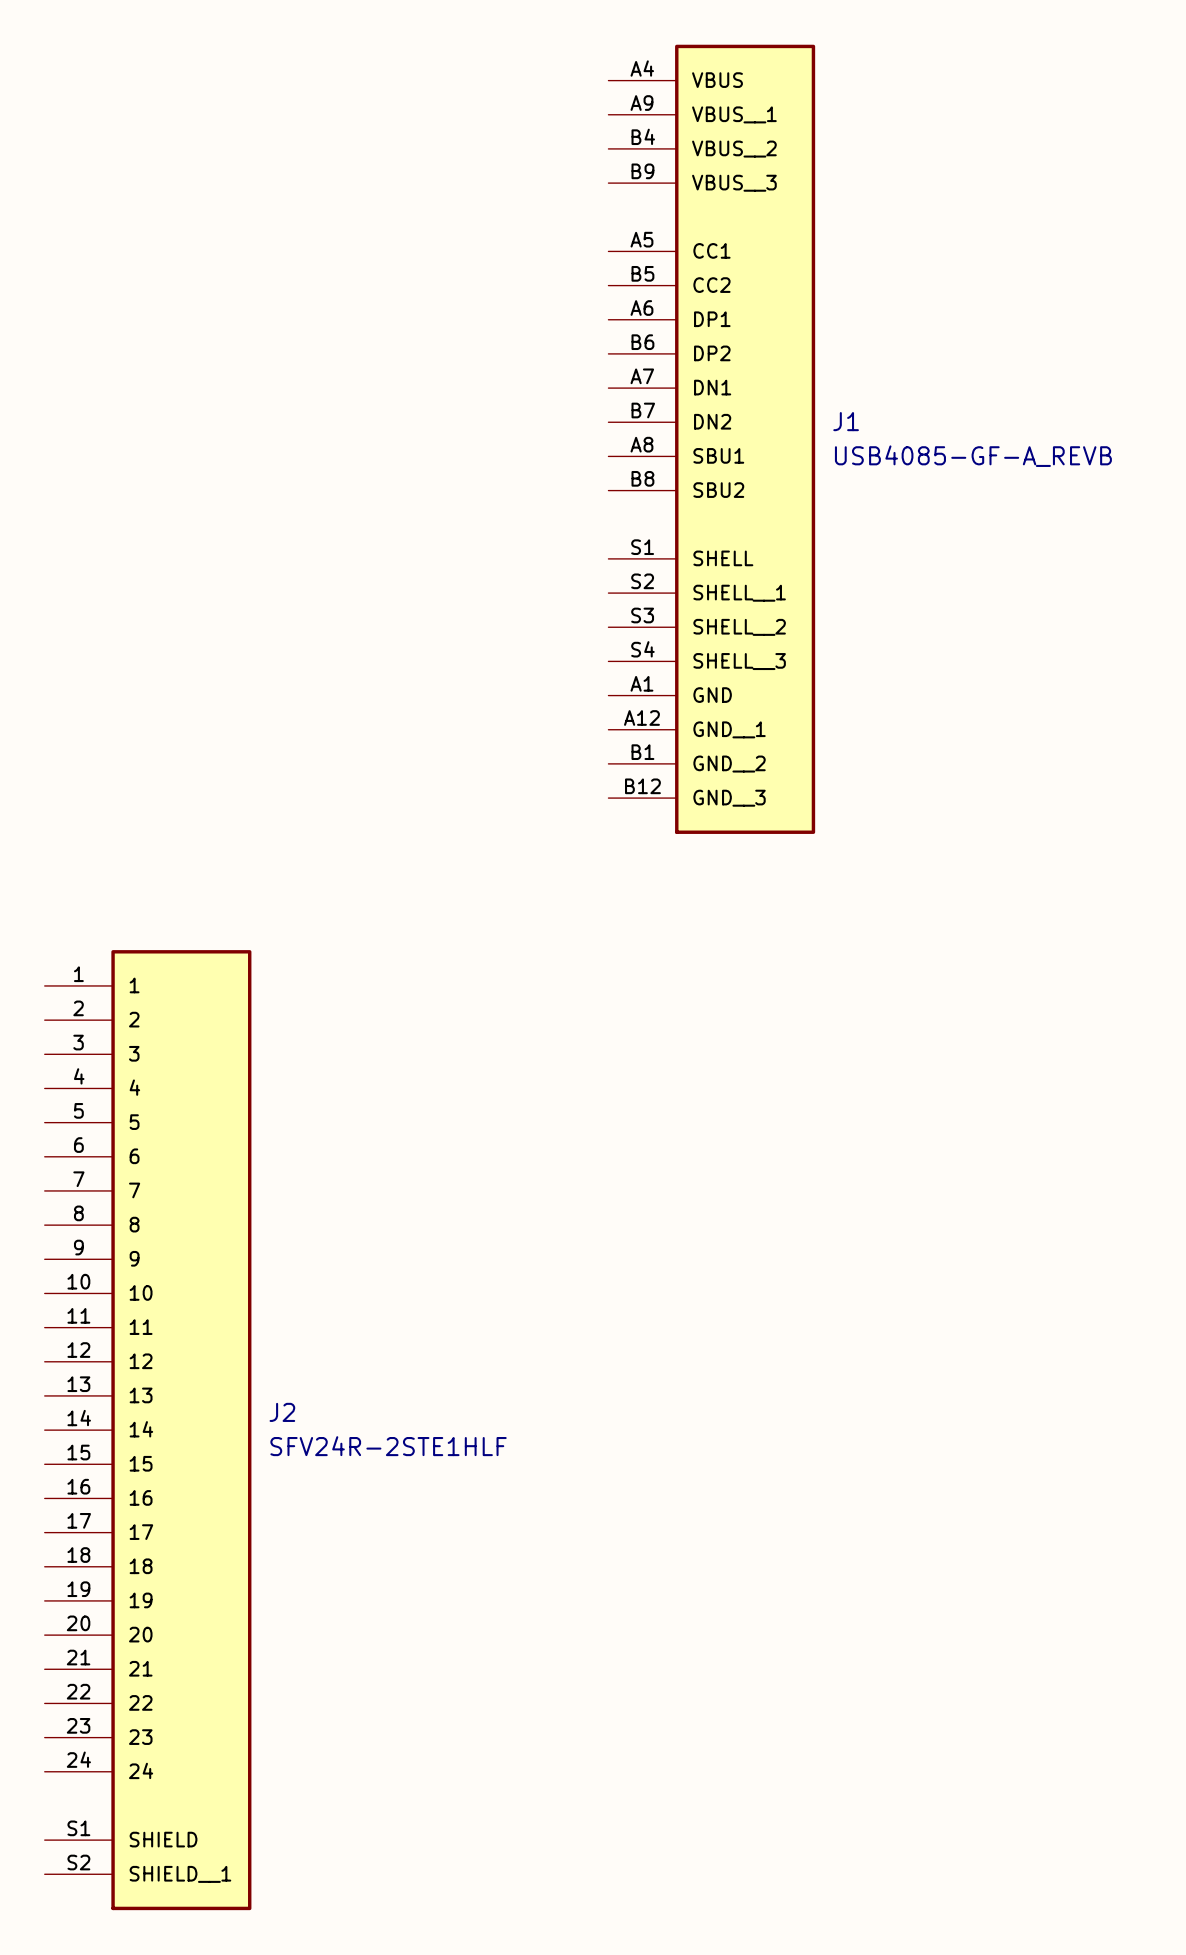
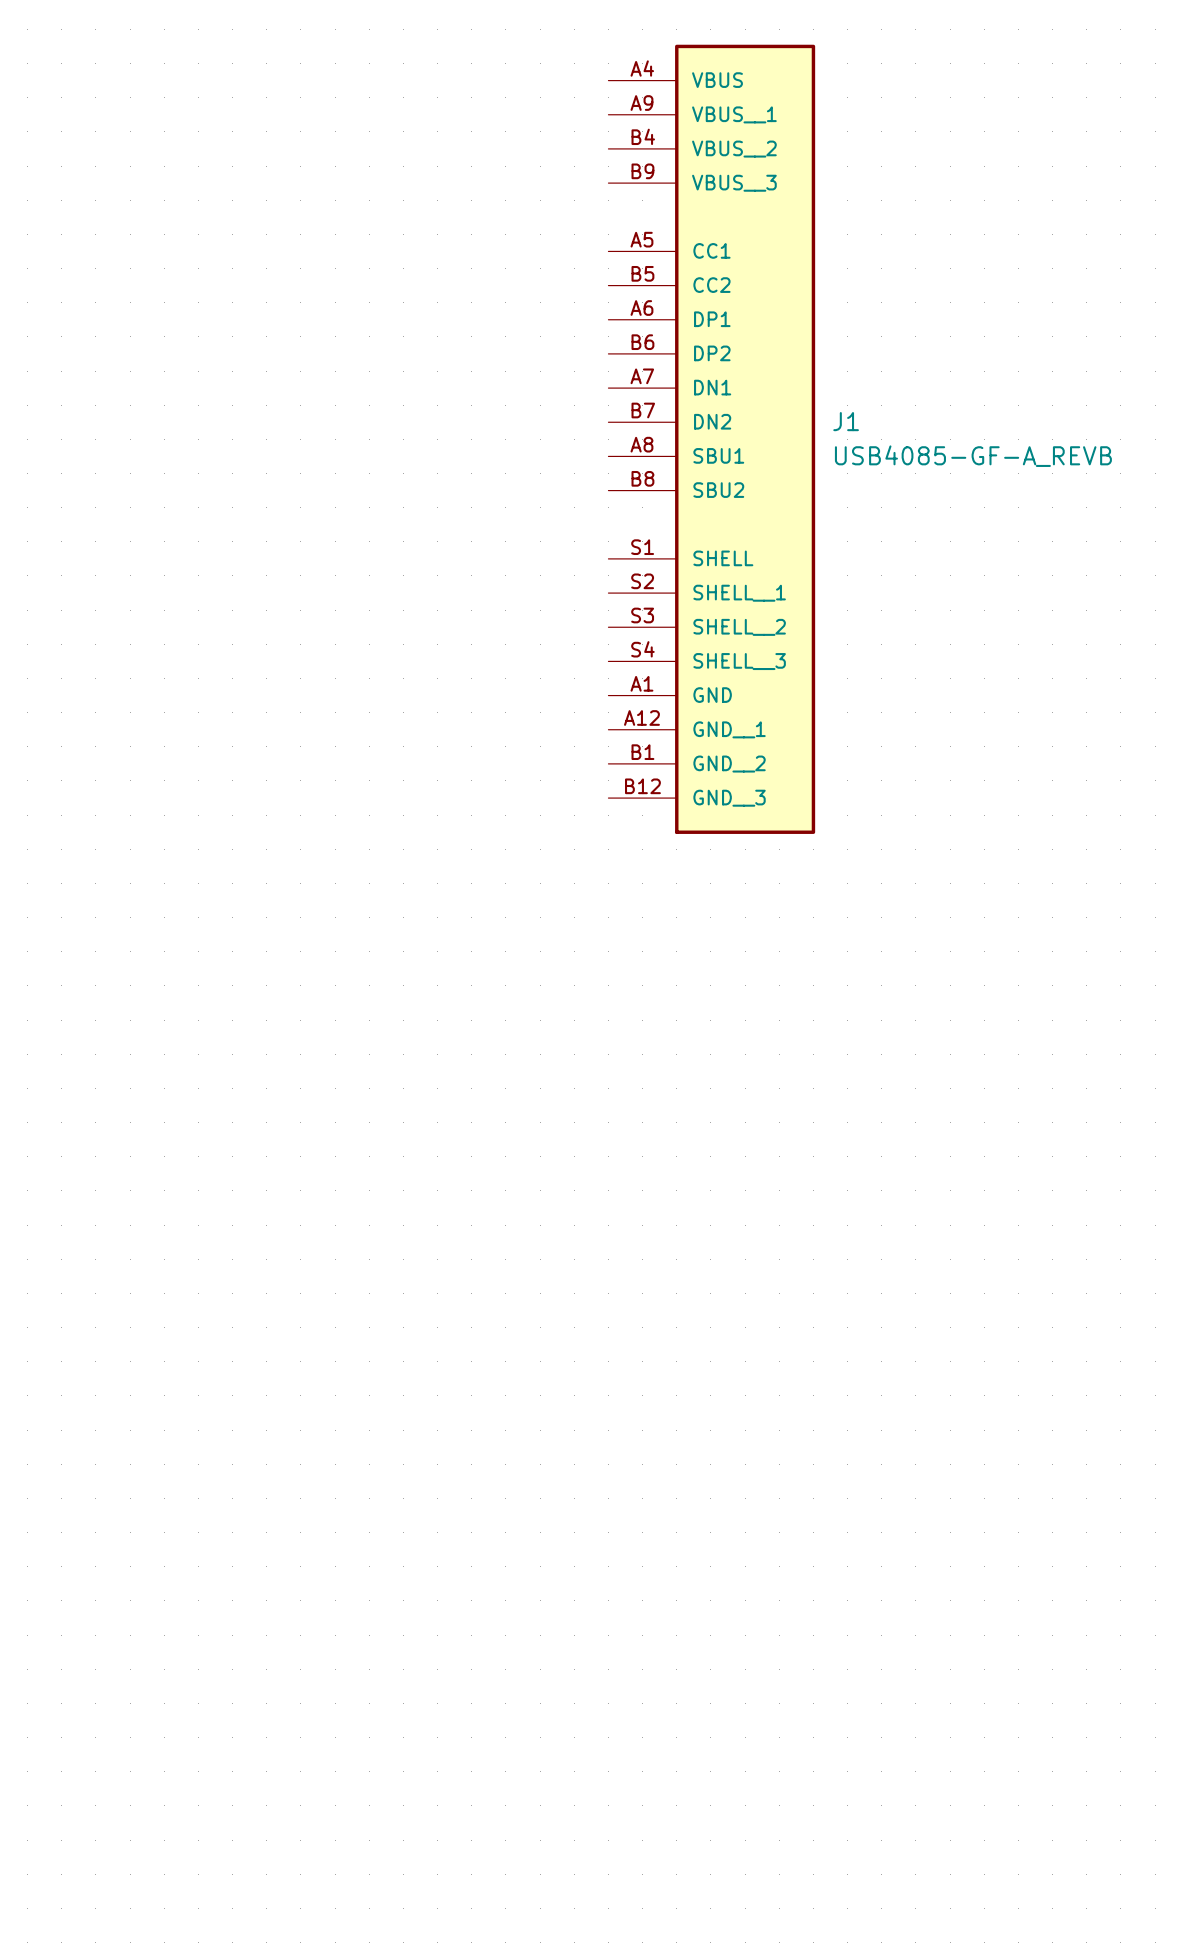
J2: SFV24R-2STE1HLF (148, 1430) -> none

